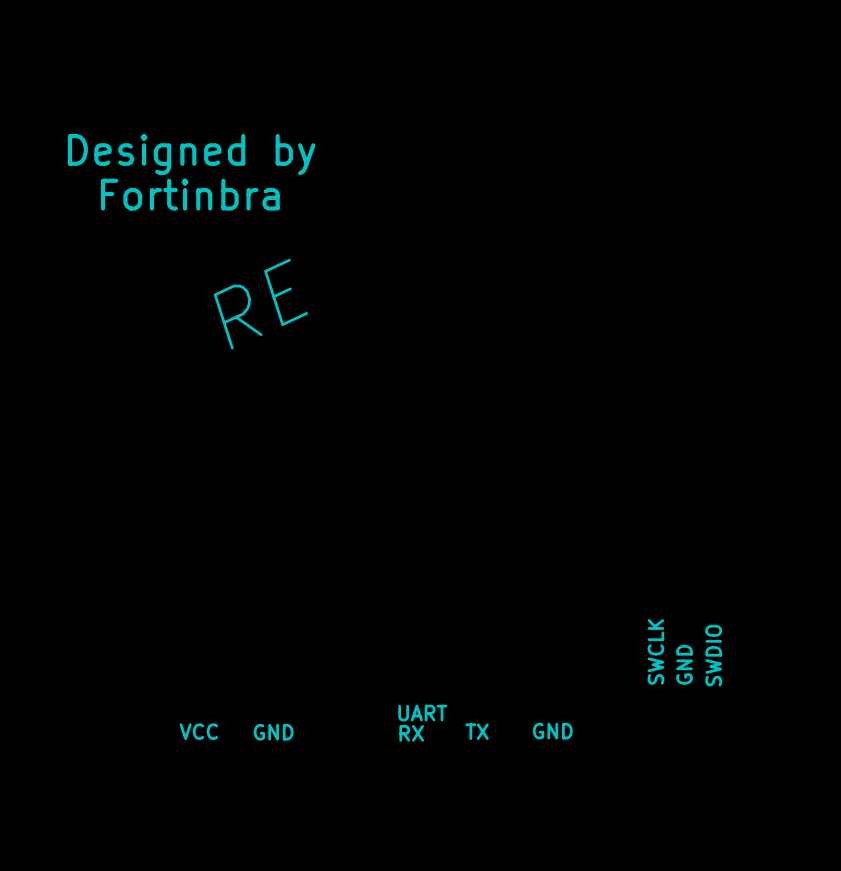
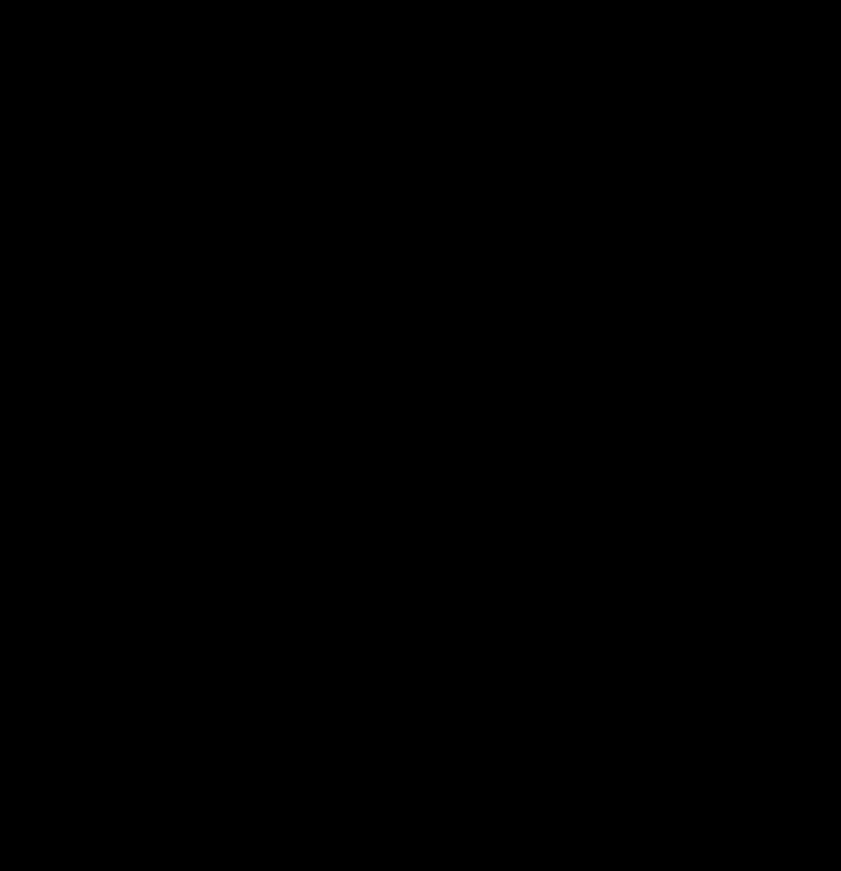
text: Designed by (191, 154) -> none
text: Fortinbra (190, 194) -> none
text: RE (260, 304) -> none
text: SWCLK (655, 651) -> none
text: SWDIO (713, 655) -> none
text: GND (684, 664) -> none
text: UART (422, 713) -> none
text: VCC (198, 731) -> none
text: TX (477, 731) -> none
text: GND (552, 731) -> none
text: GND (273, 732) -> none
text: RX (411, 733) -> none

